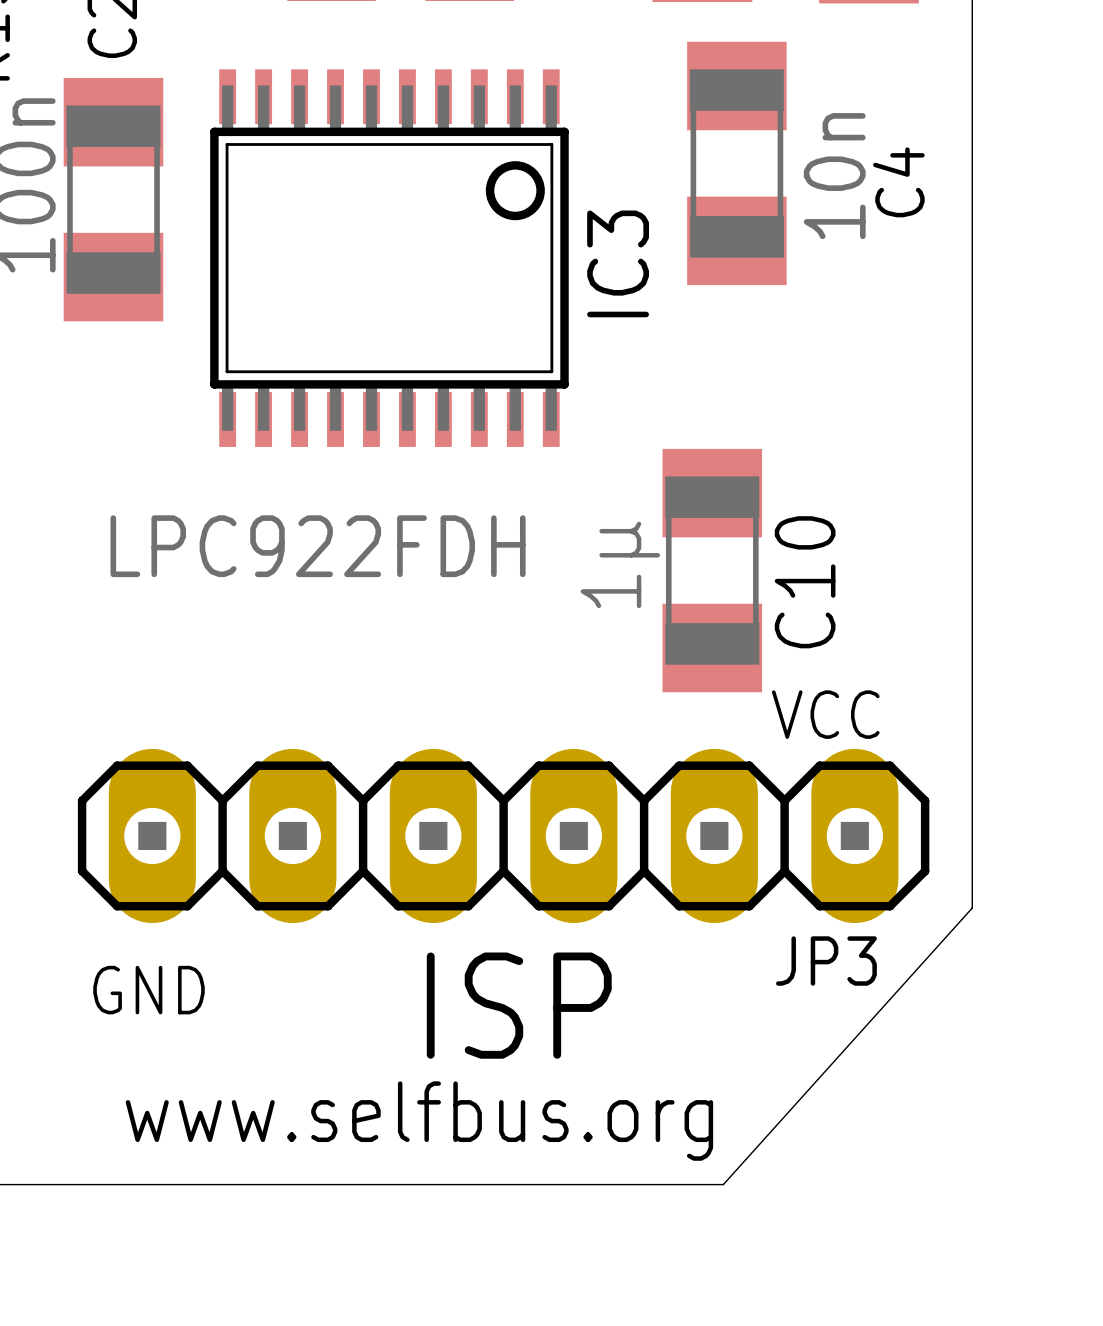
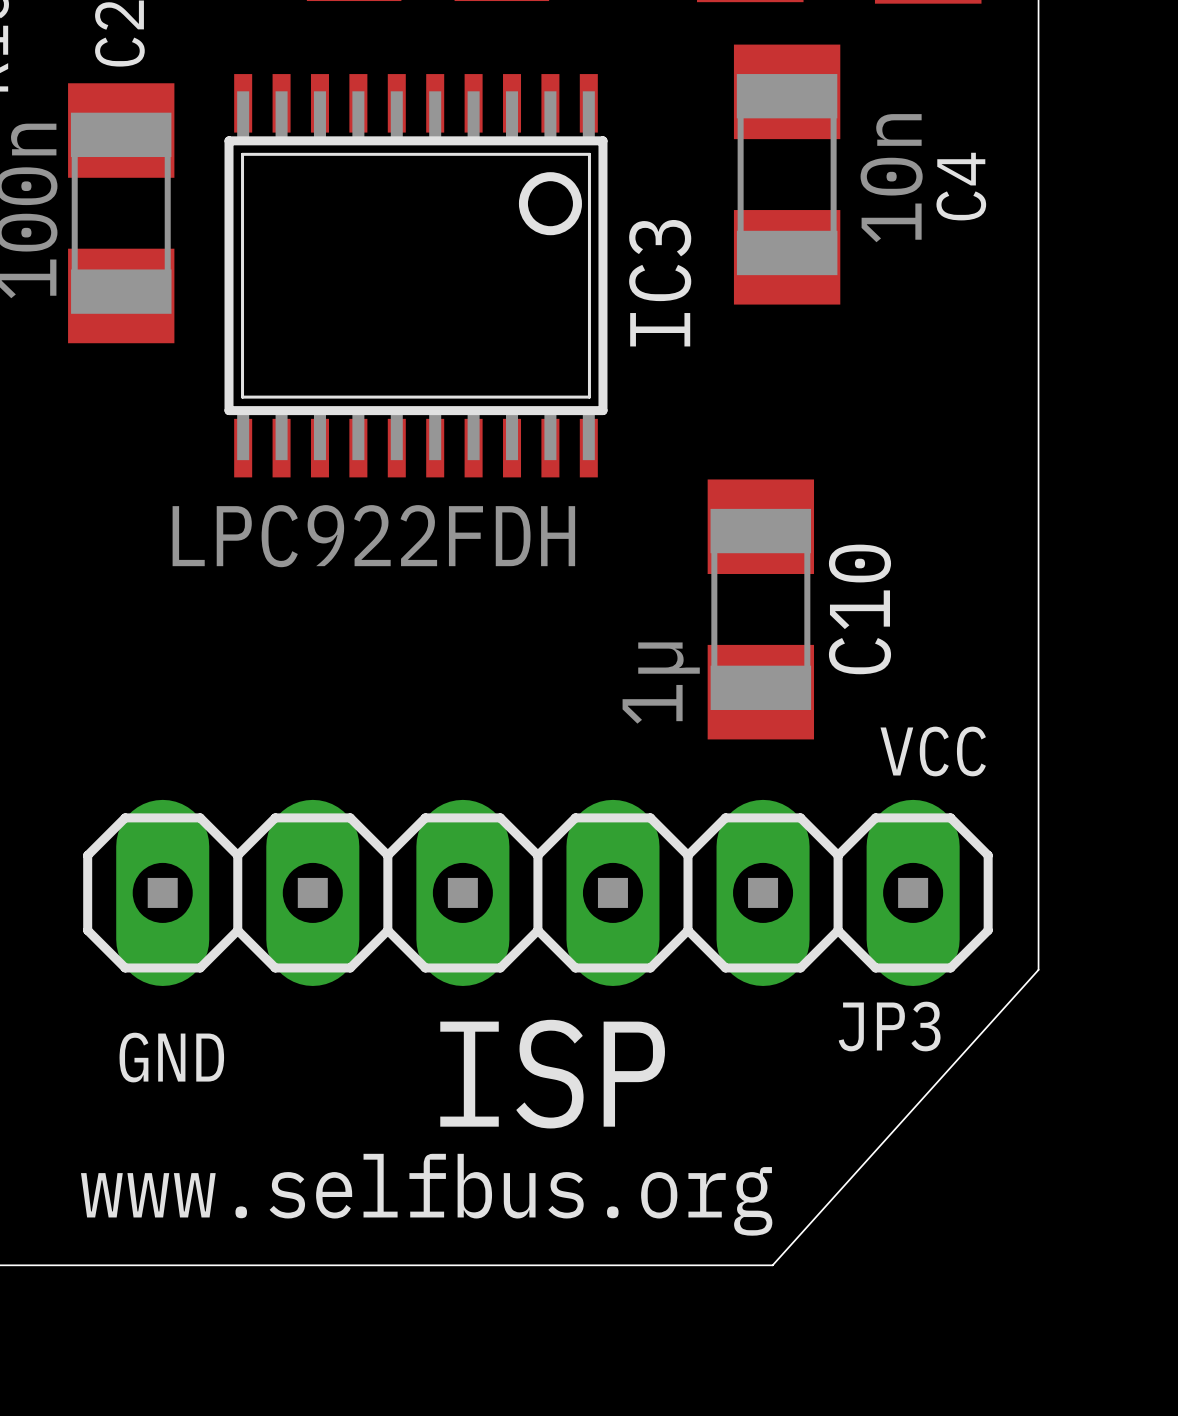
IC3 value position: LPC922FDH (318, 546) -> LPC922FDH (373, 536)
C10 value position: 1µ (620, 564) -> 1µ (661, 683)
text position: VCC (825, 714) -> VCC (933, 751)

